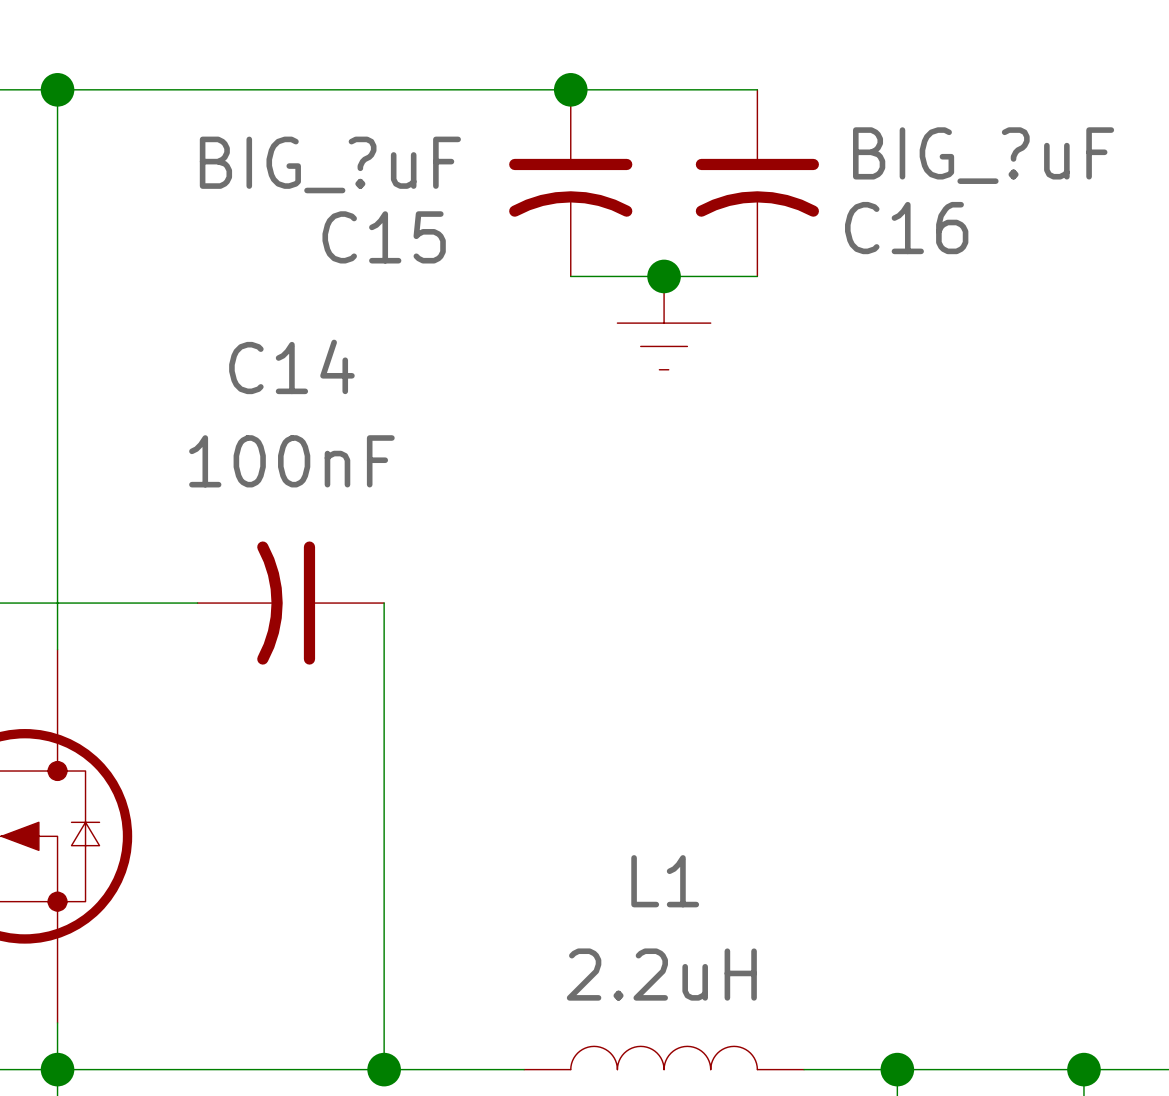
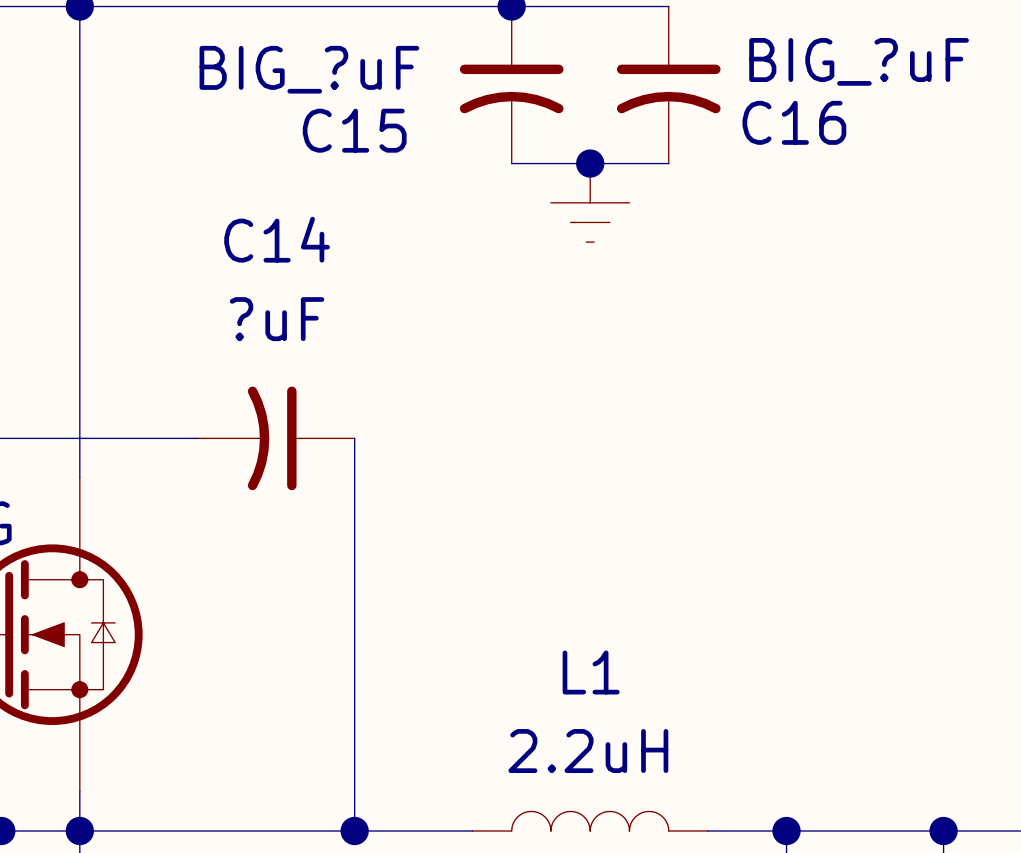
C14 value: 100nF (291, 461) -> ?uF (277, 319)

